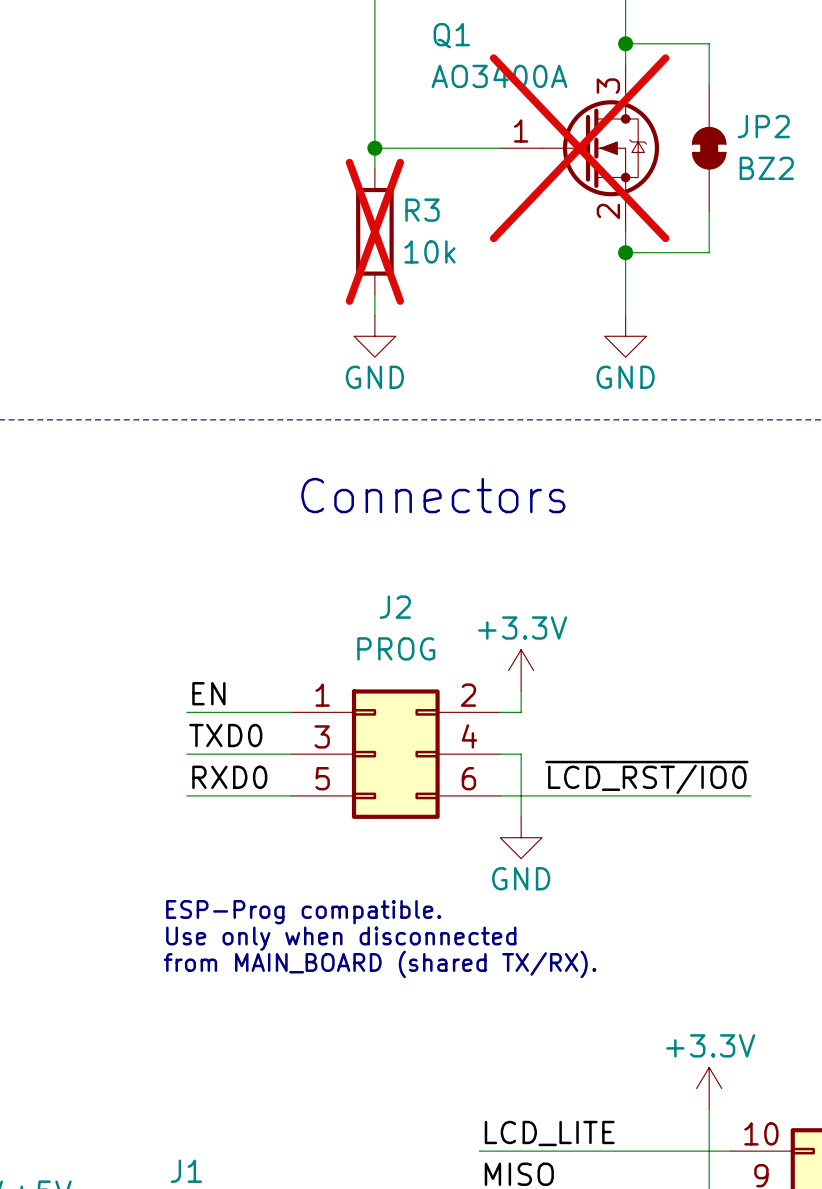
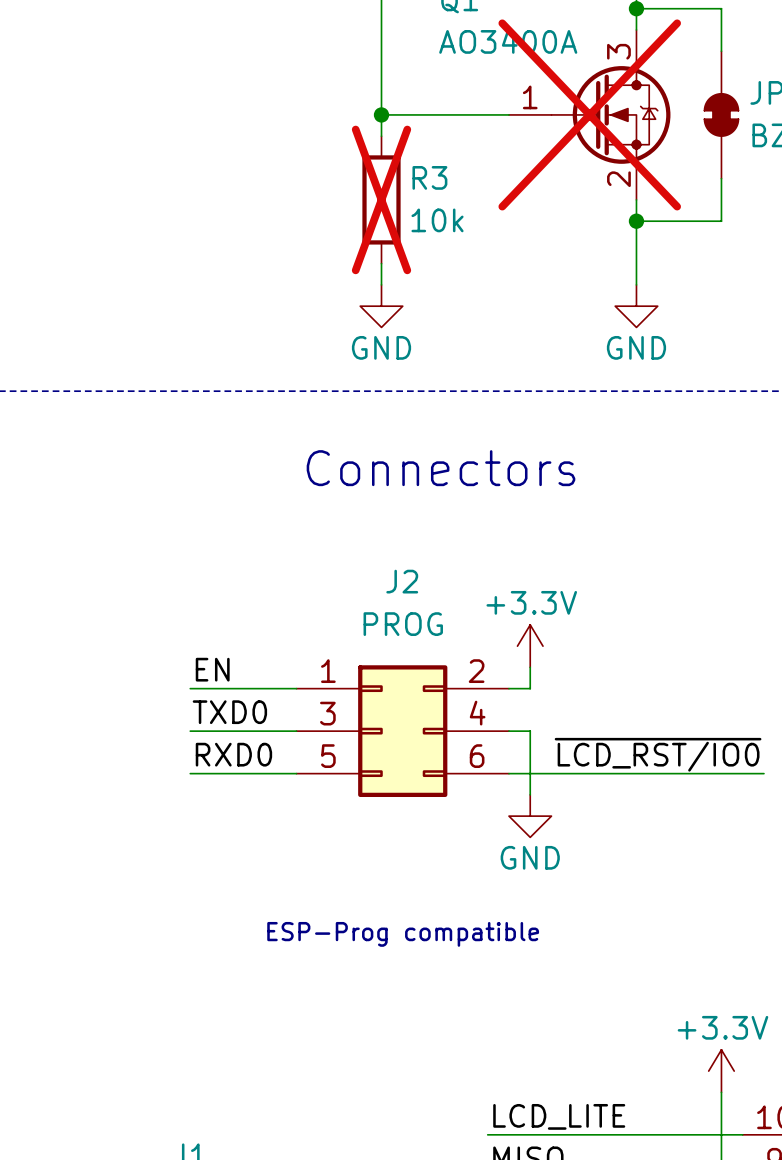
text: ESP-Prog compatible. (303, 912) -> none
text: Use only when disconnected (341, 938) -> none
text: none -> ESP-Prog compatible (403, 934)
text: from MAIN_BOARD (shared TX/RX). (380, 964) -> none

